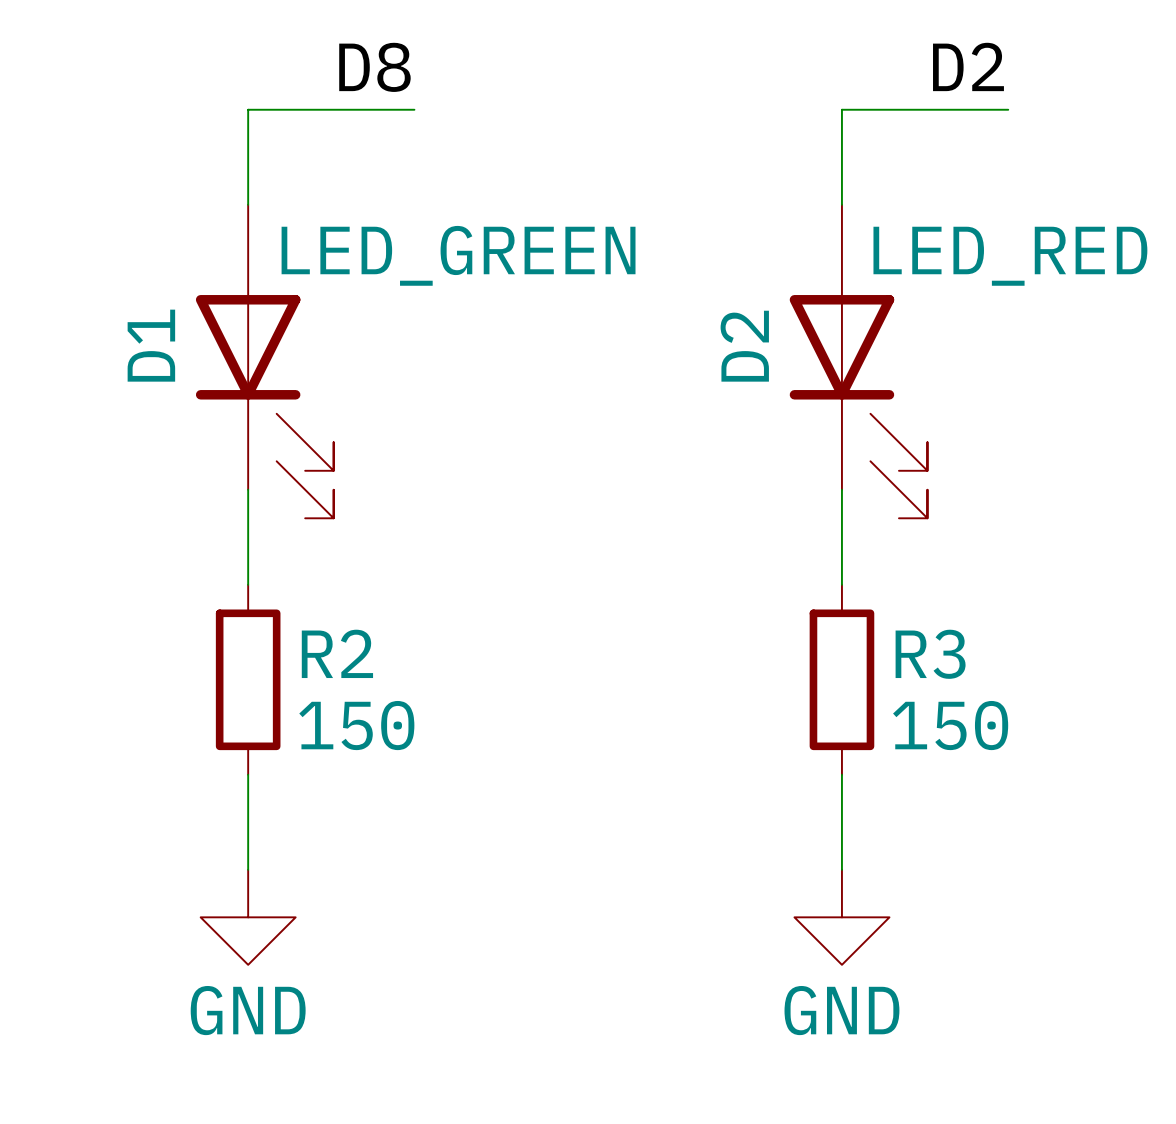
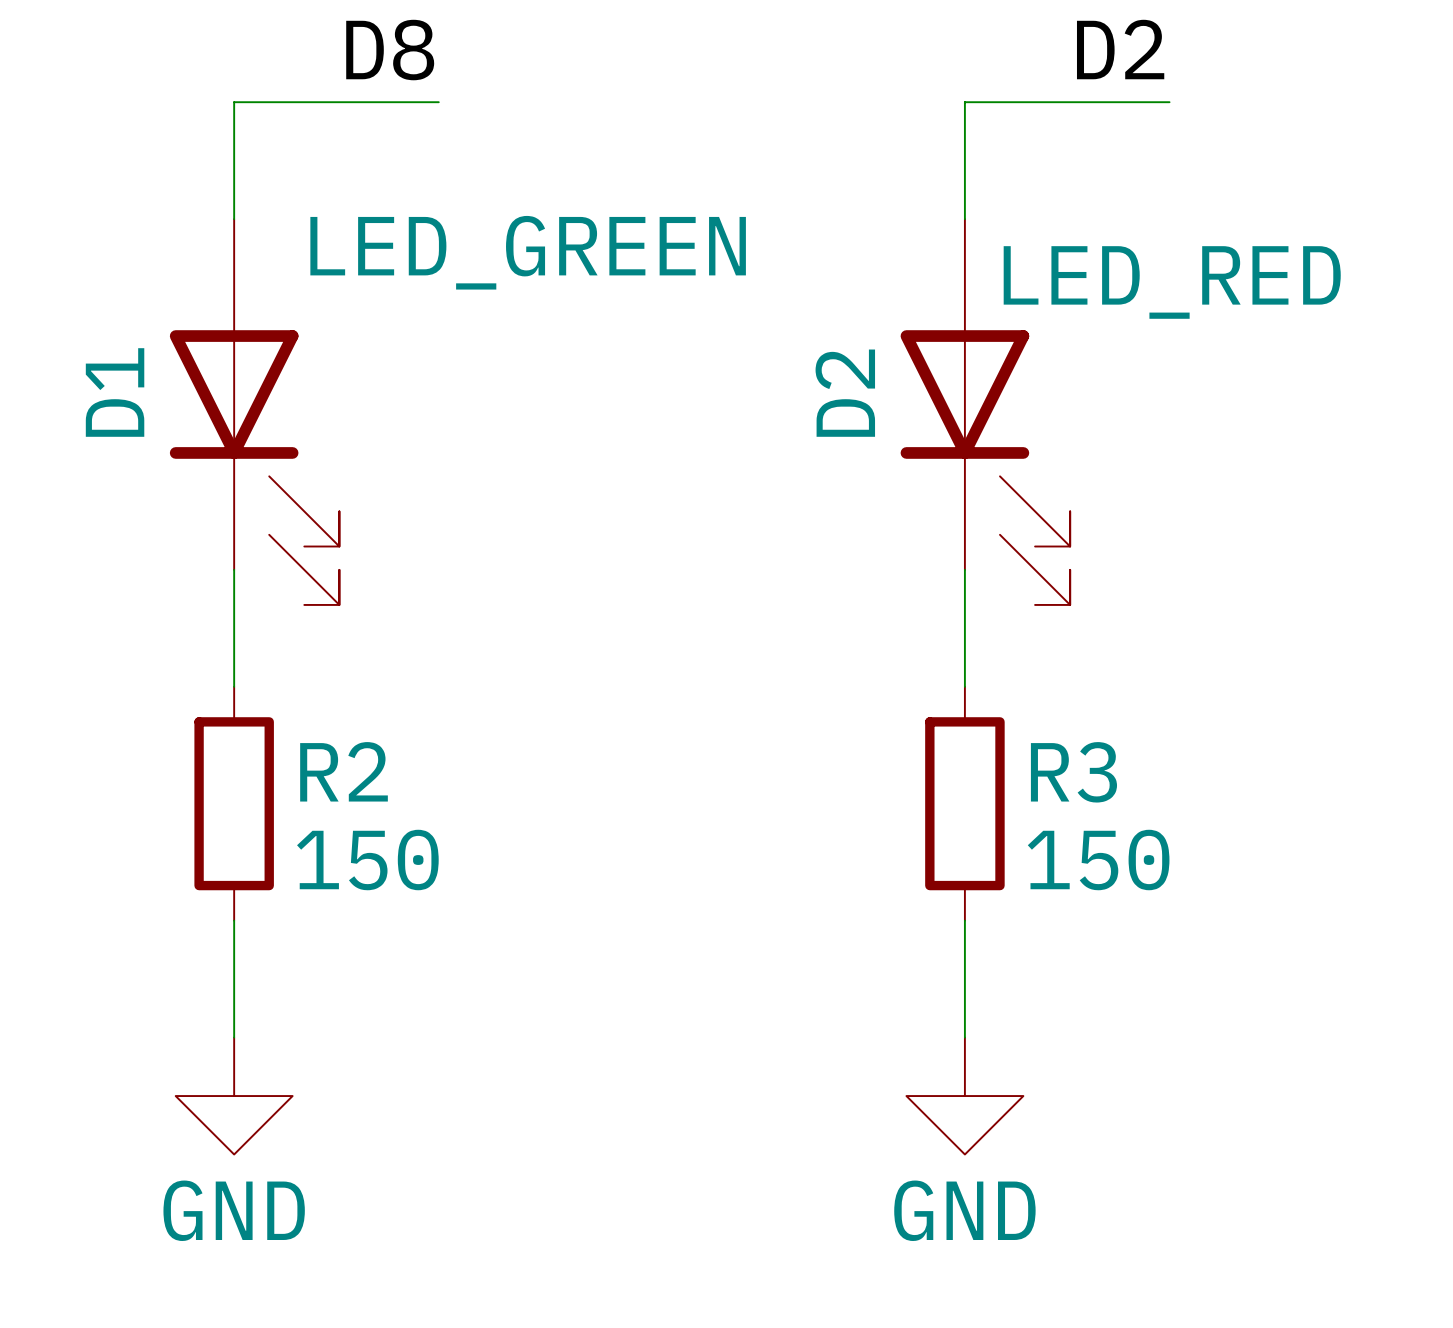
D1 value position: LED_GREEN (458, 255) -> LED_GREEN (528, 252)

